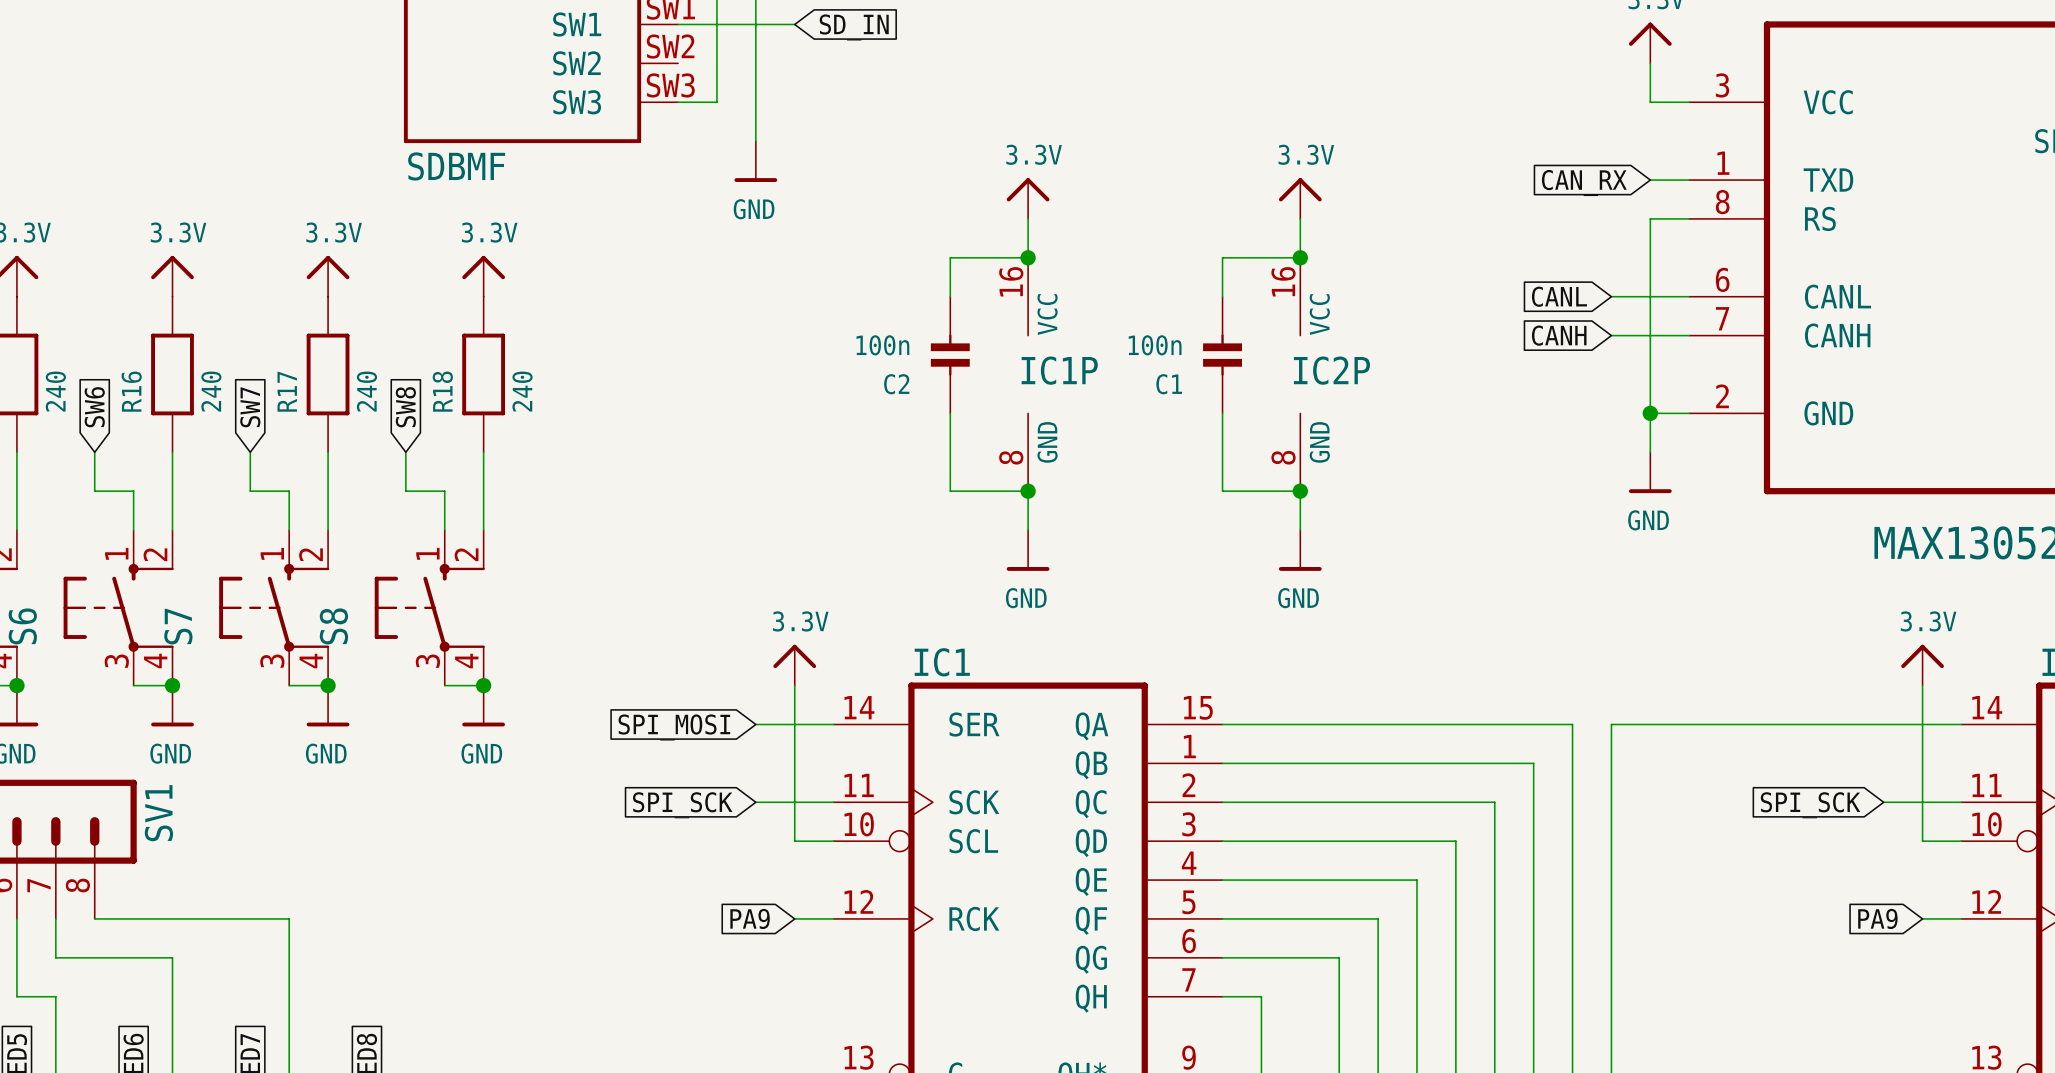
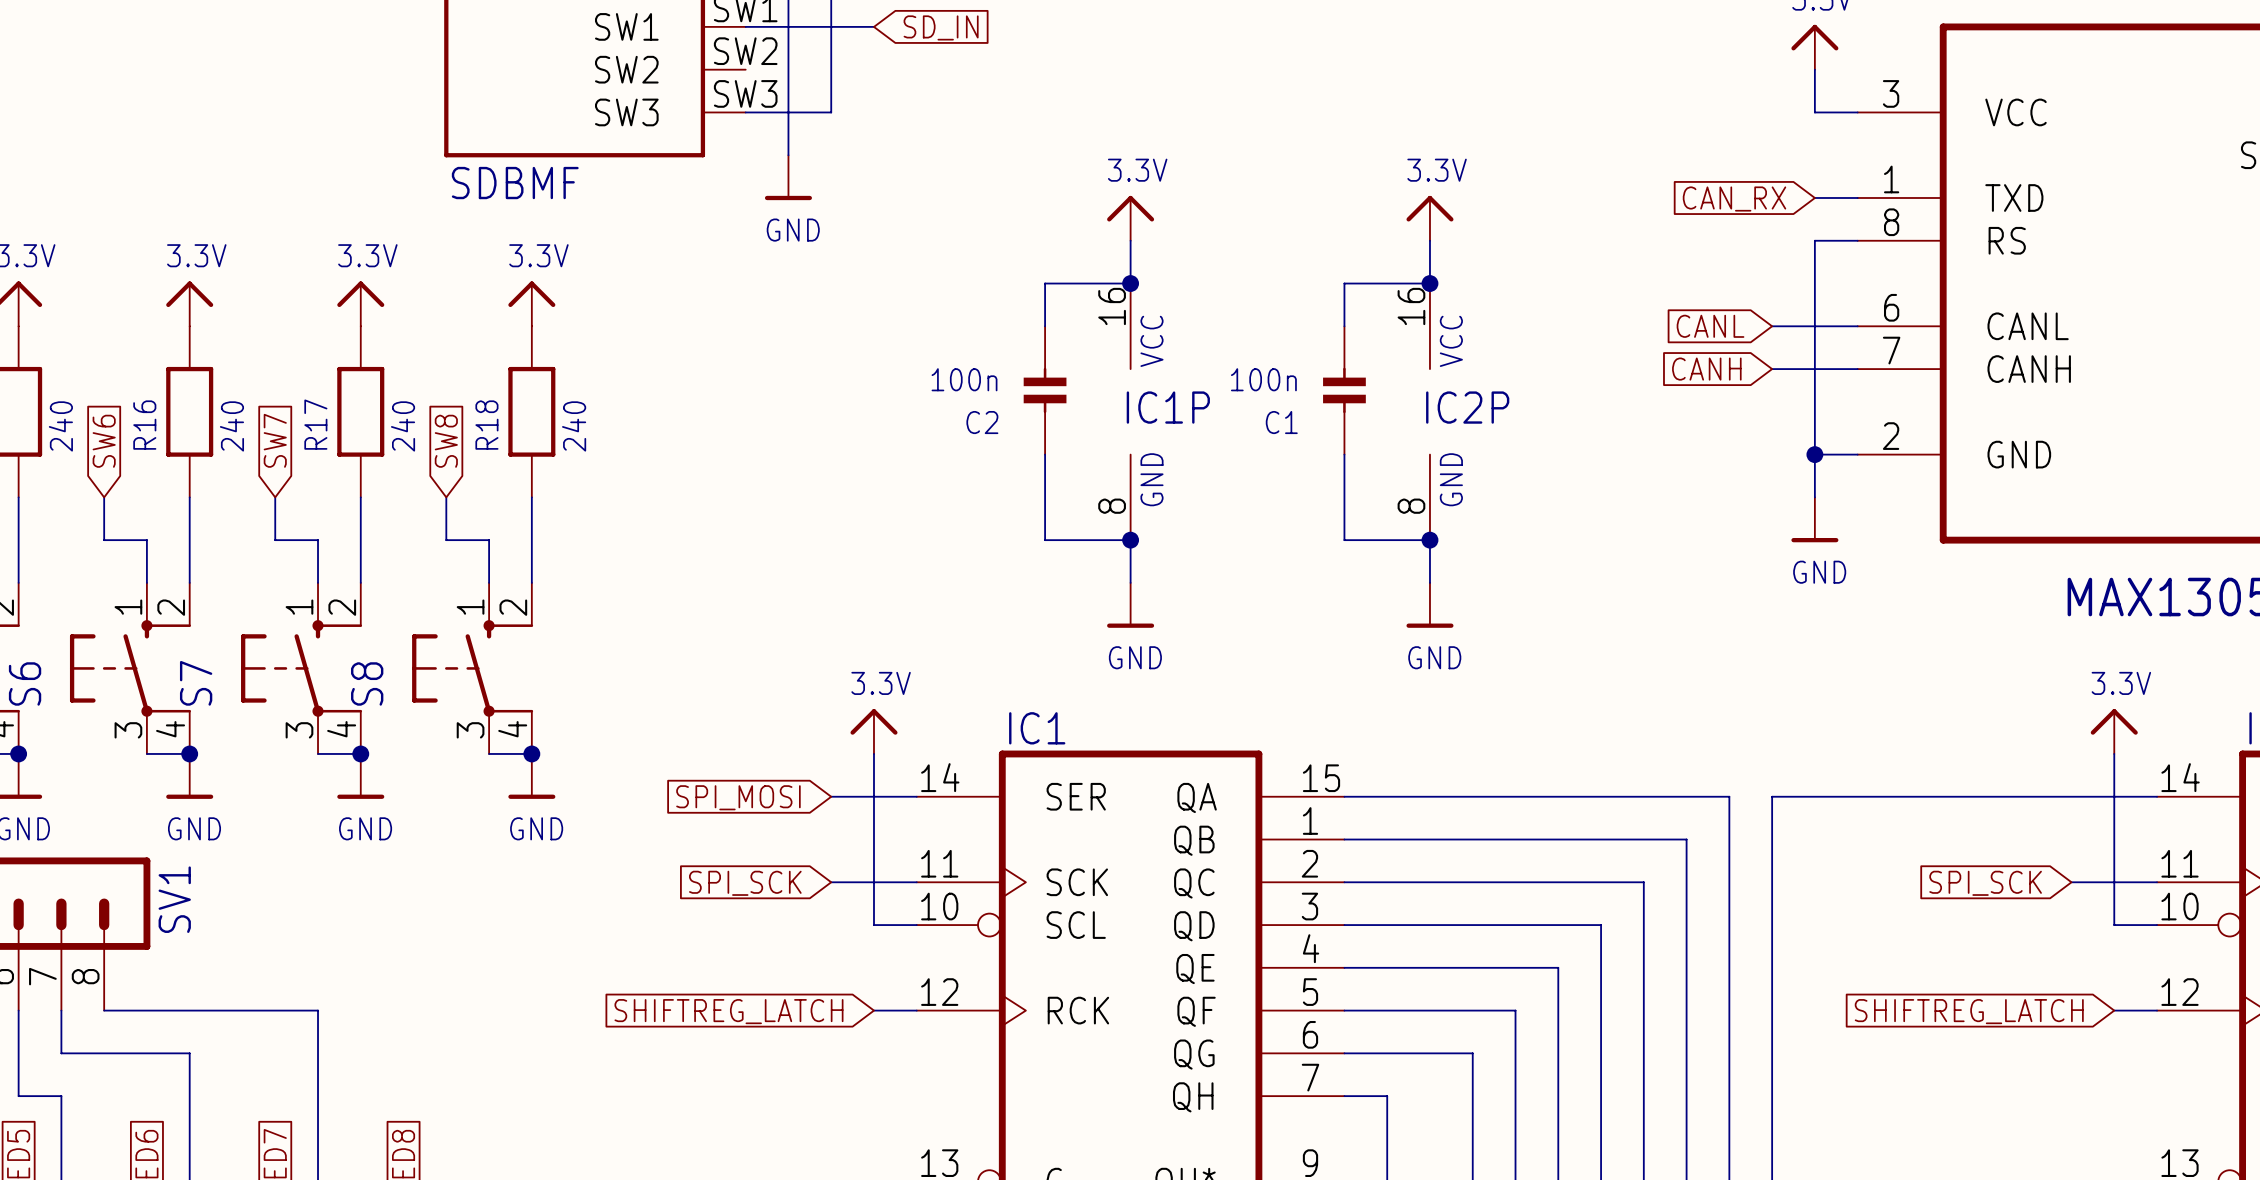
wire: (755, 102) (755, 141) -> (831, 112) (788, 112) (788, 155)
power symbol position: GND (755, 161) -> GND (788, 177)
global label: PA9 (750, 918) -> SHIFTREG_LATCH (728, 1011)
global label: PA9 (1877, 918) -> SHIFTREG_LATCH (1969, 1011)

